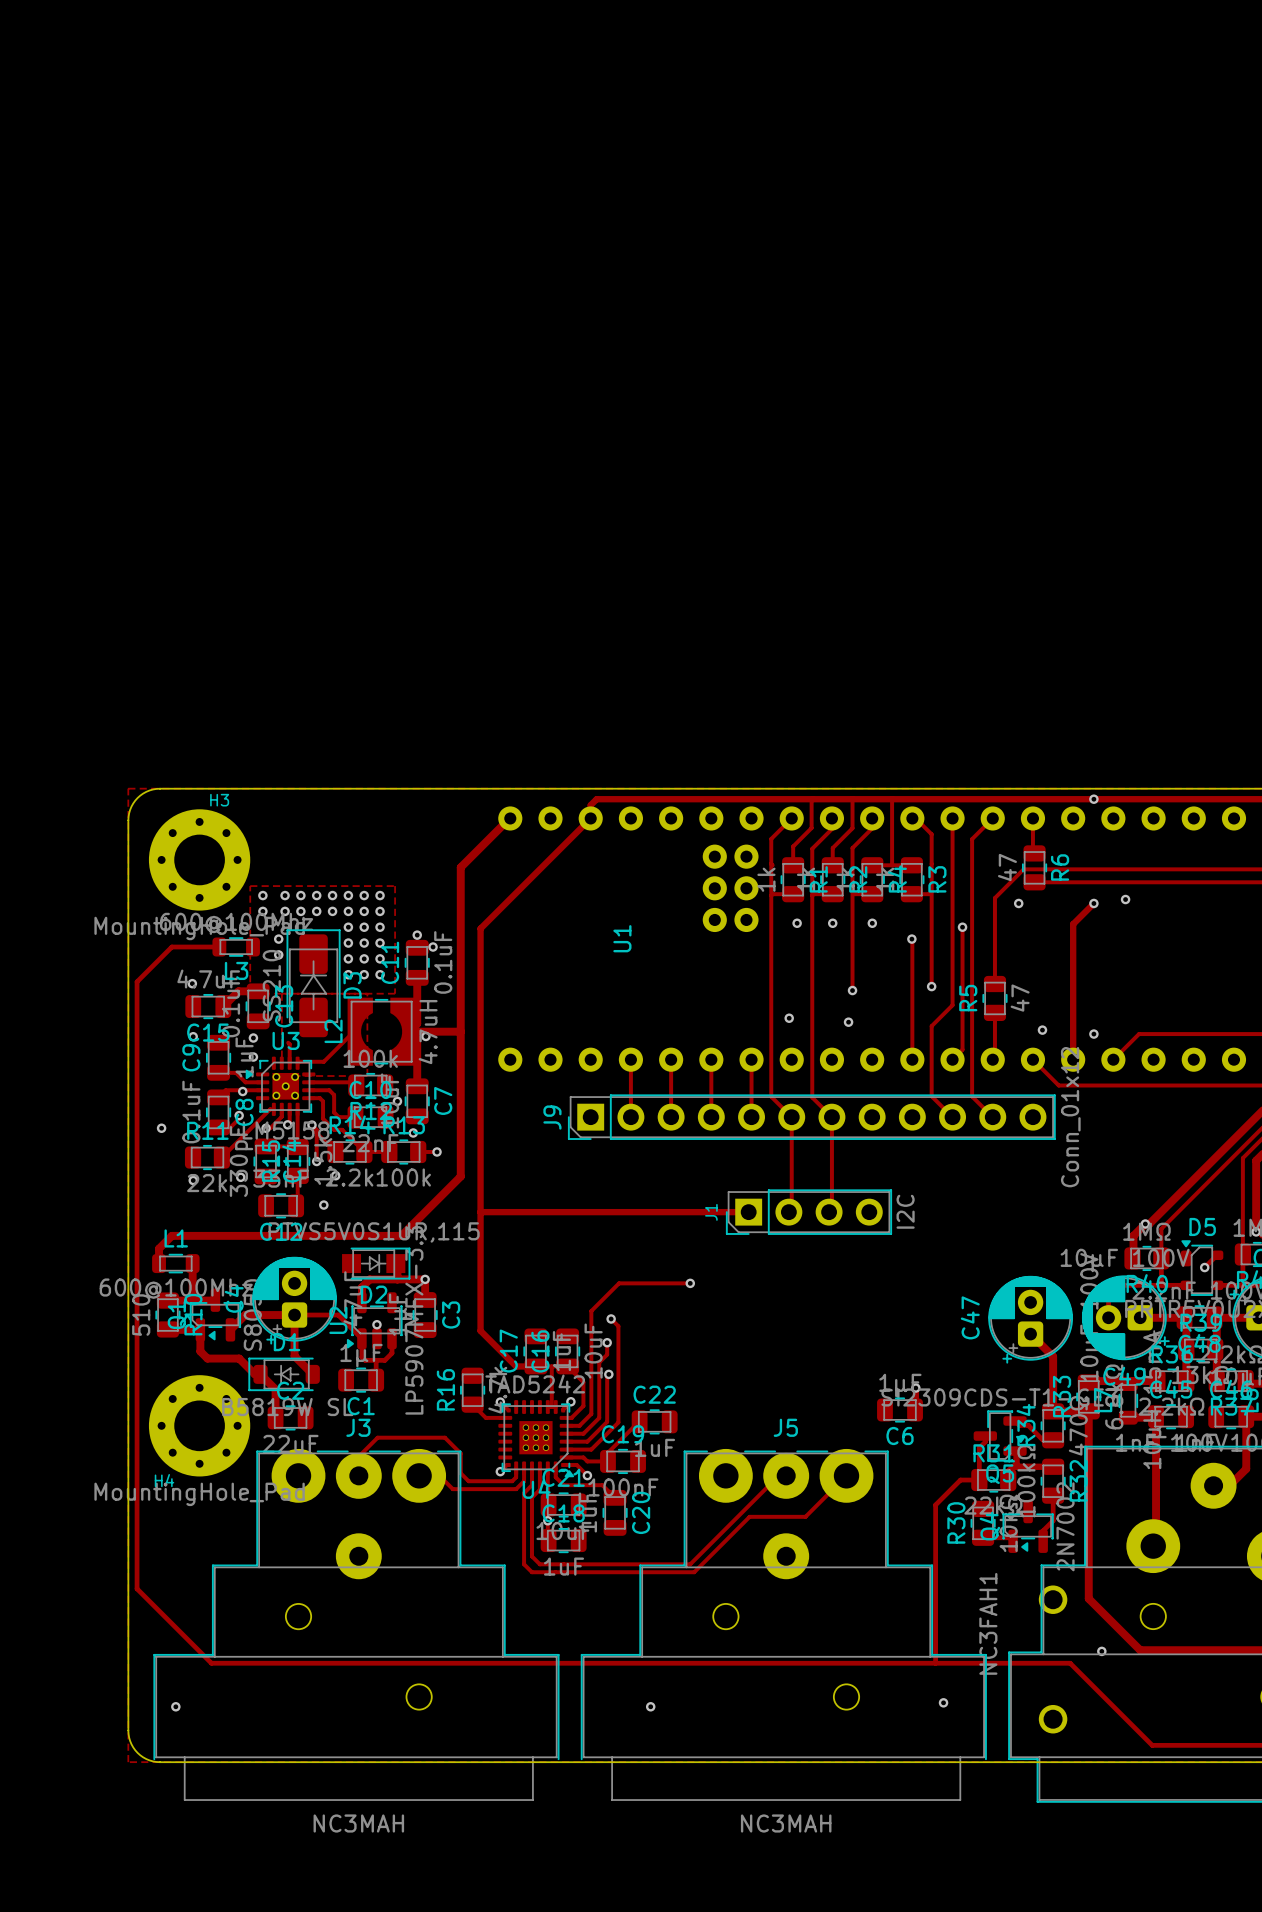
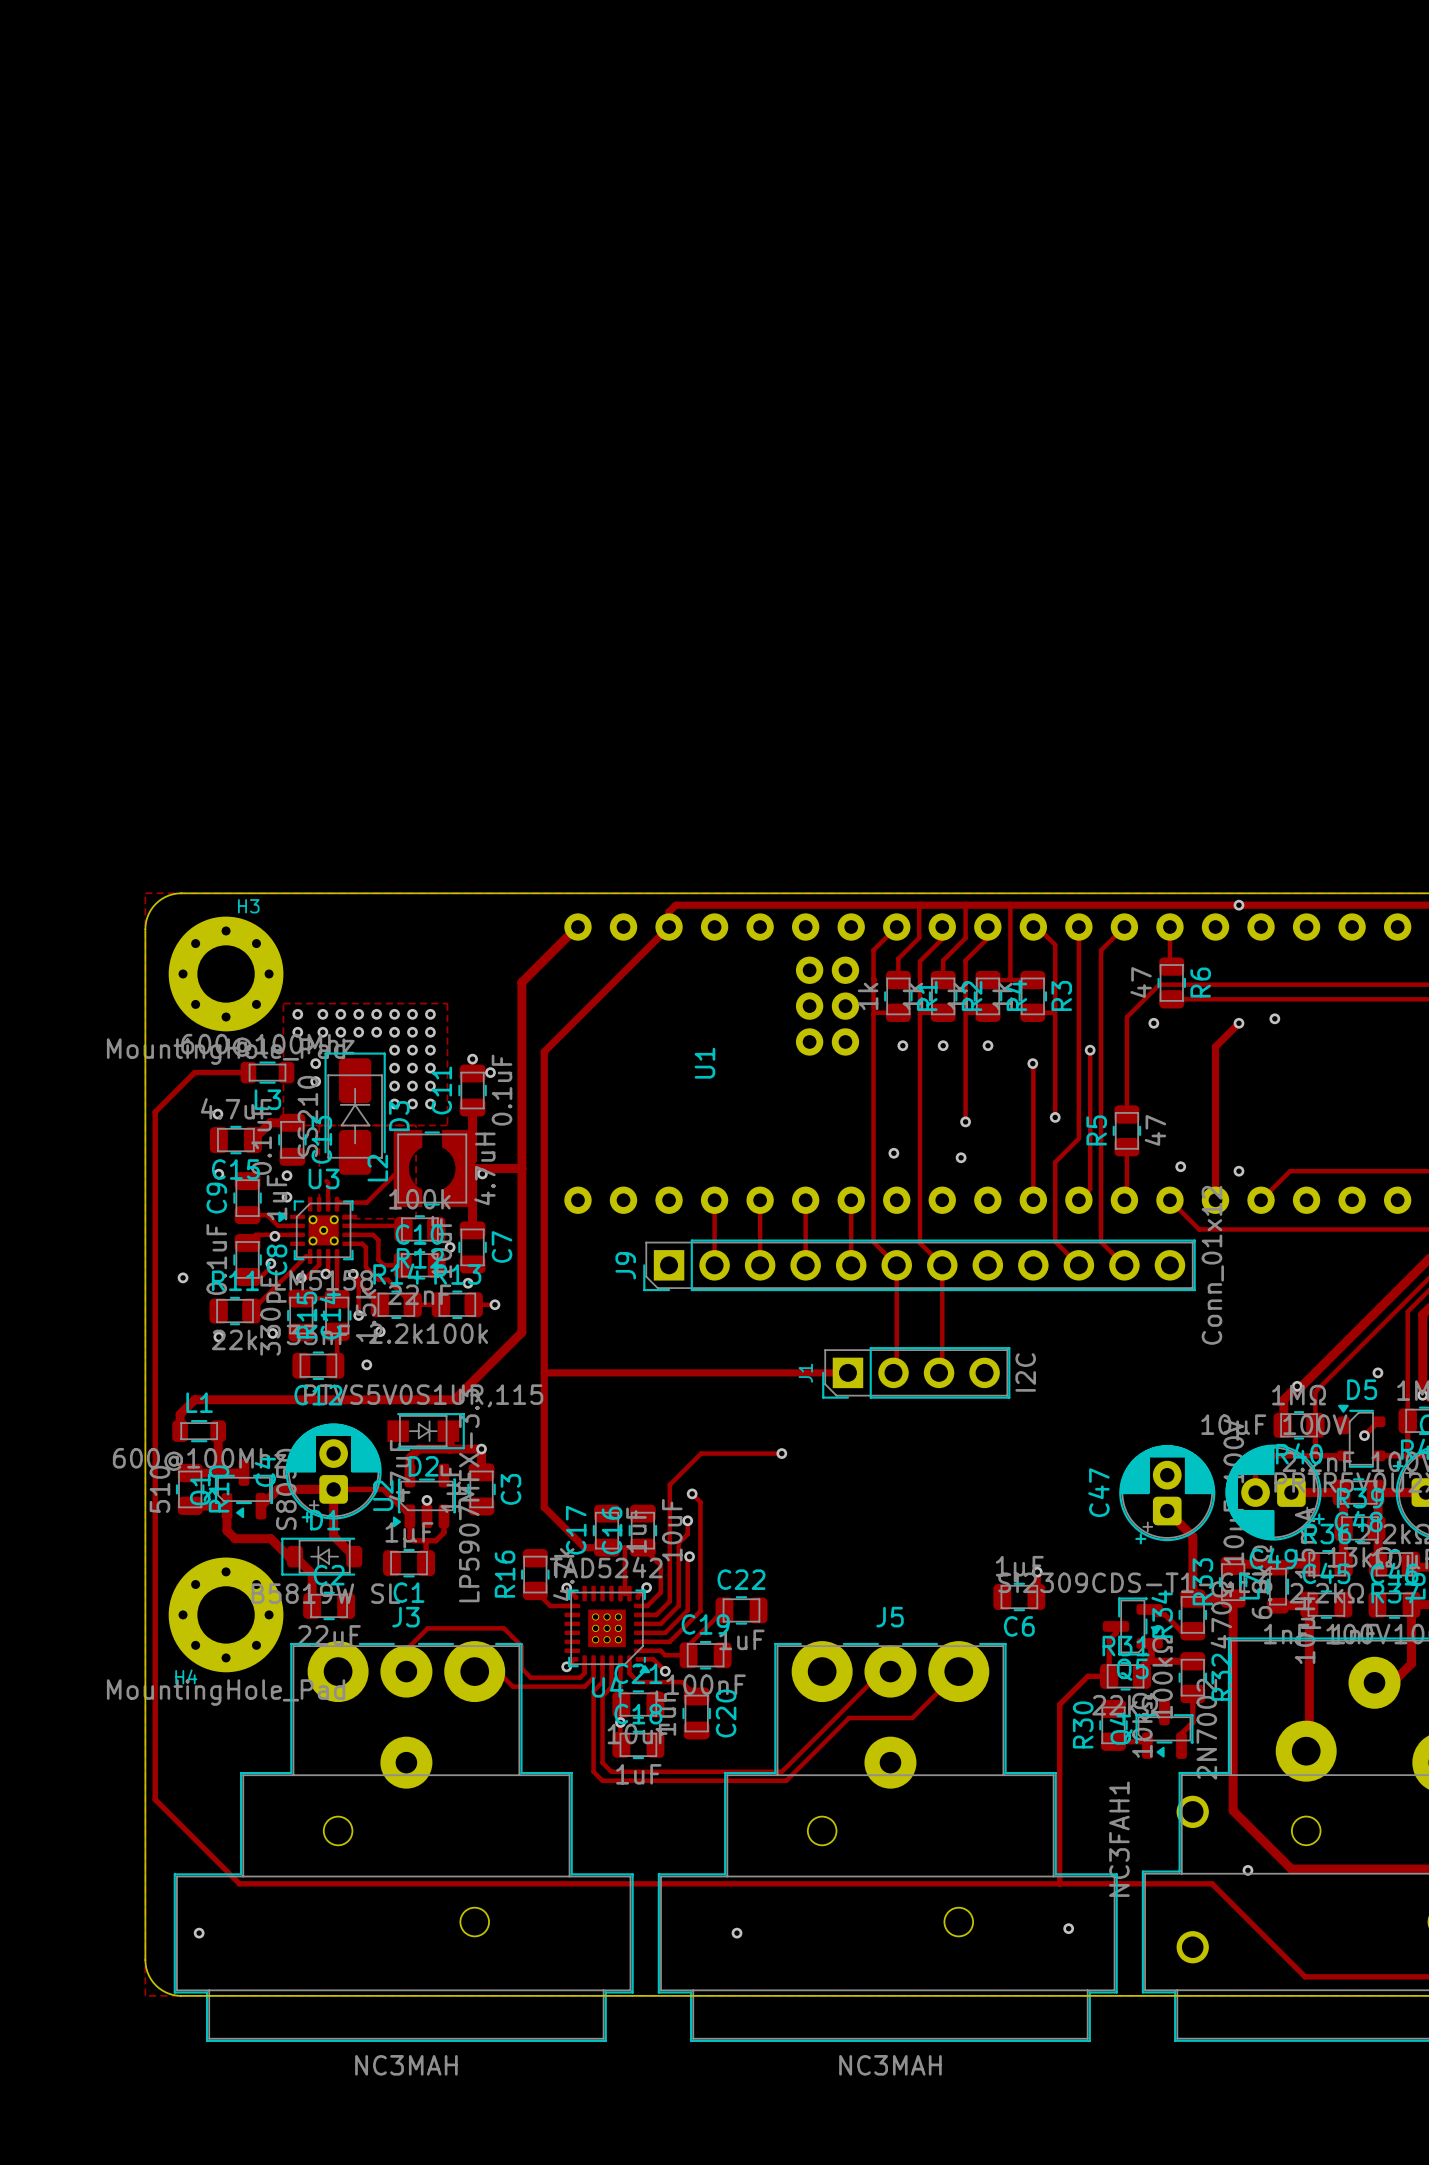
via: none -> (1377, 1372)
J3 footprint: [153, 1448, 560, 1801] -> [173, 1641, 634, 2042]
J5 footprint: [580, 1448, 987, 1801] -> [657, 1641, 1118, 2042]

